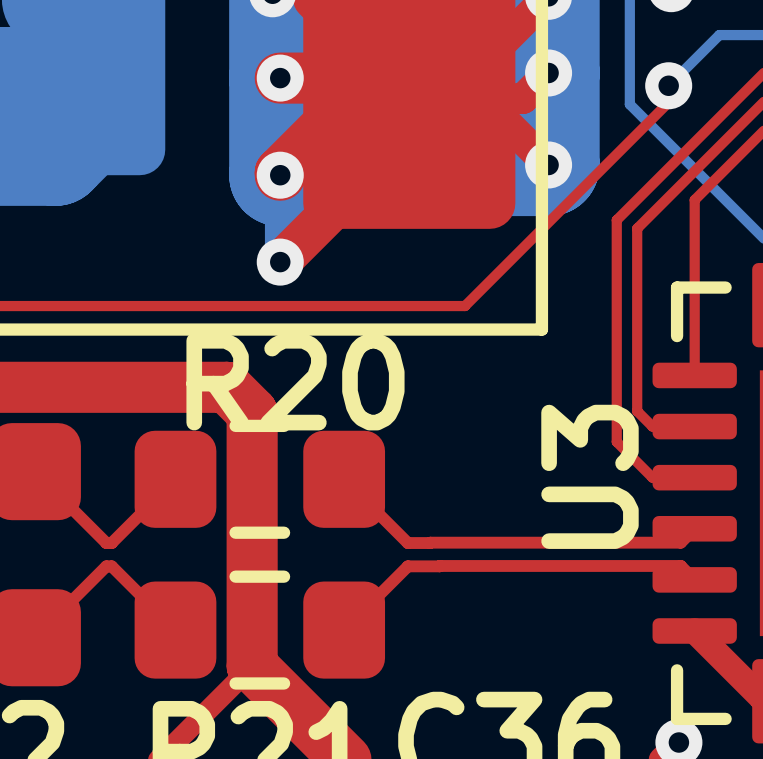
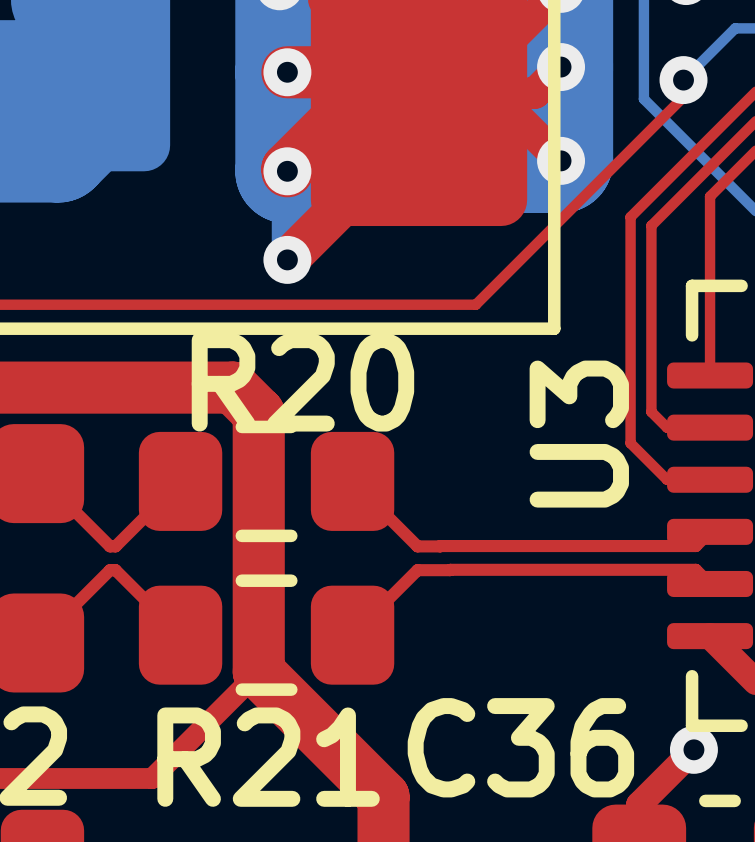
U3 name position: U3 (589, 476) -> U3 (579, 434)

